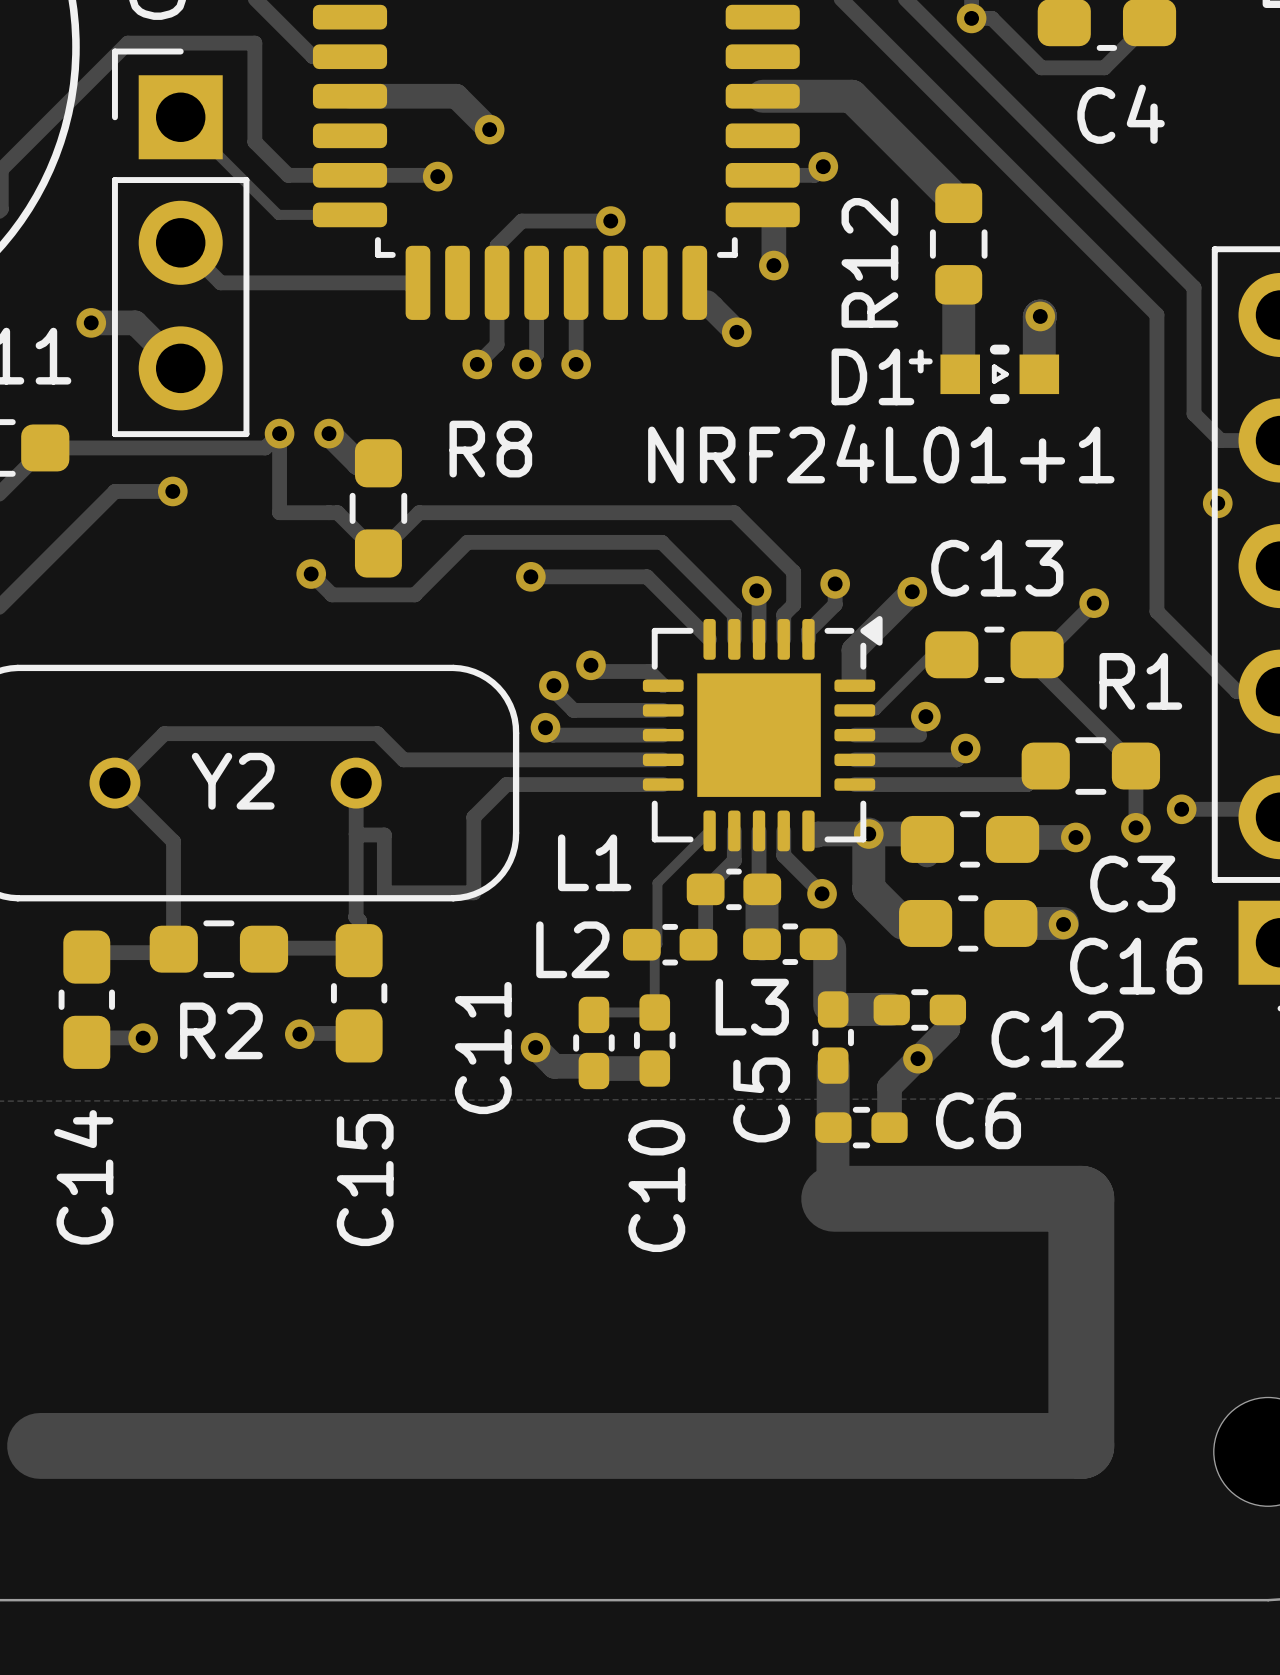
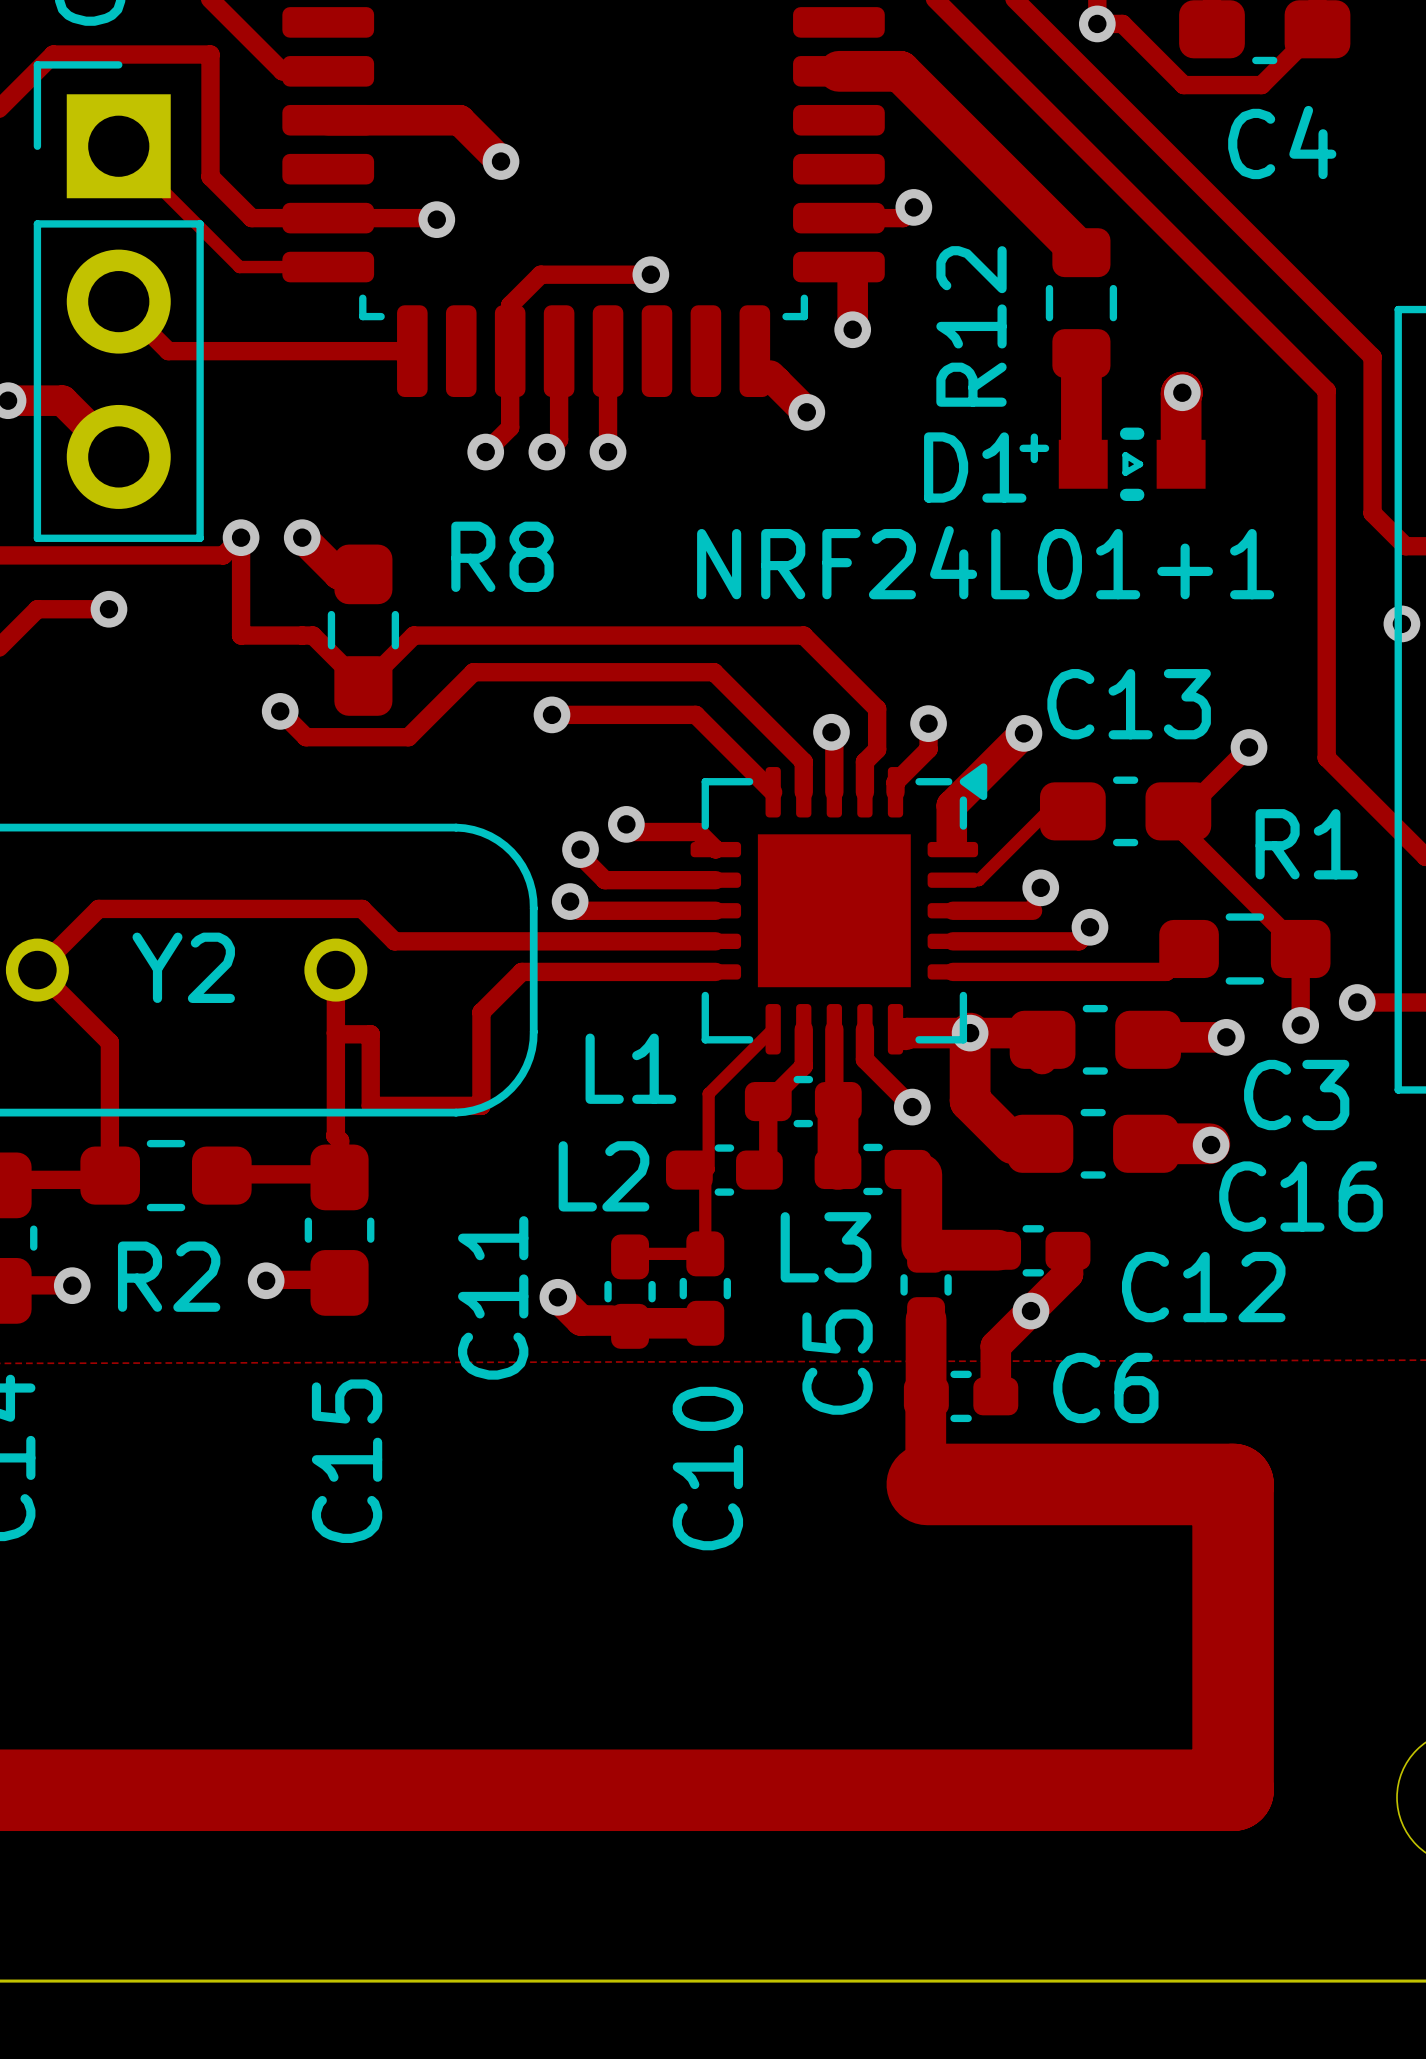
track: (762, 96) (851, 96) -> (838, 71) (900, 71) (949, 120)

